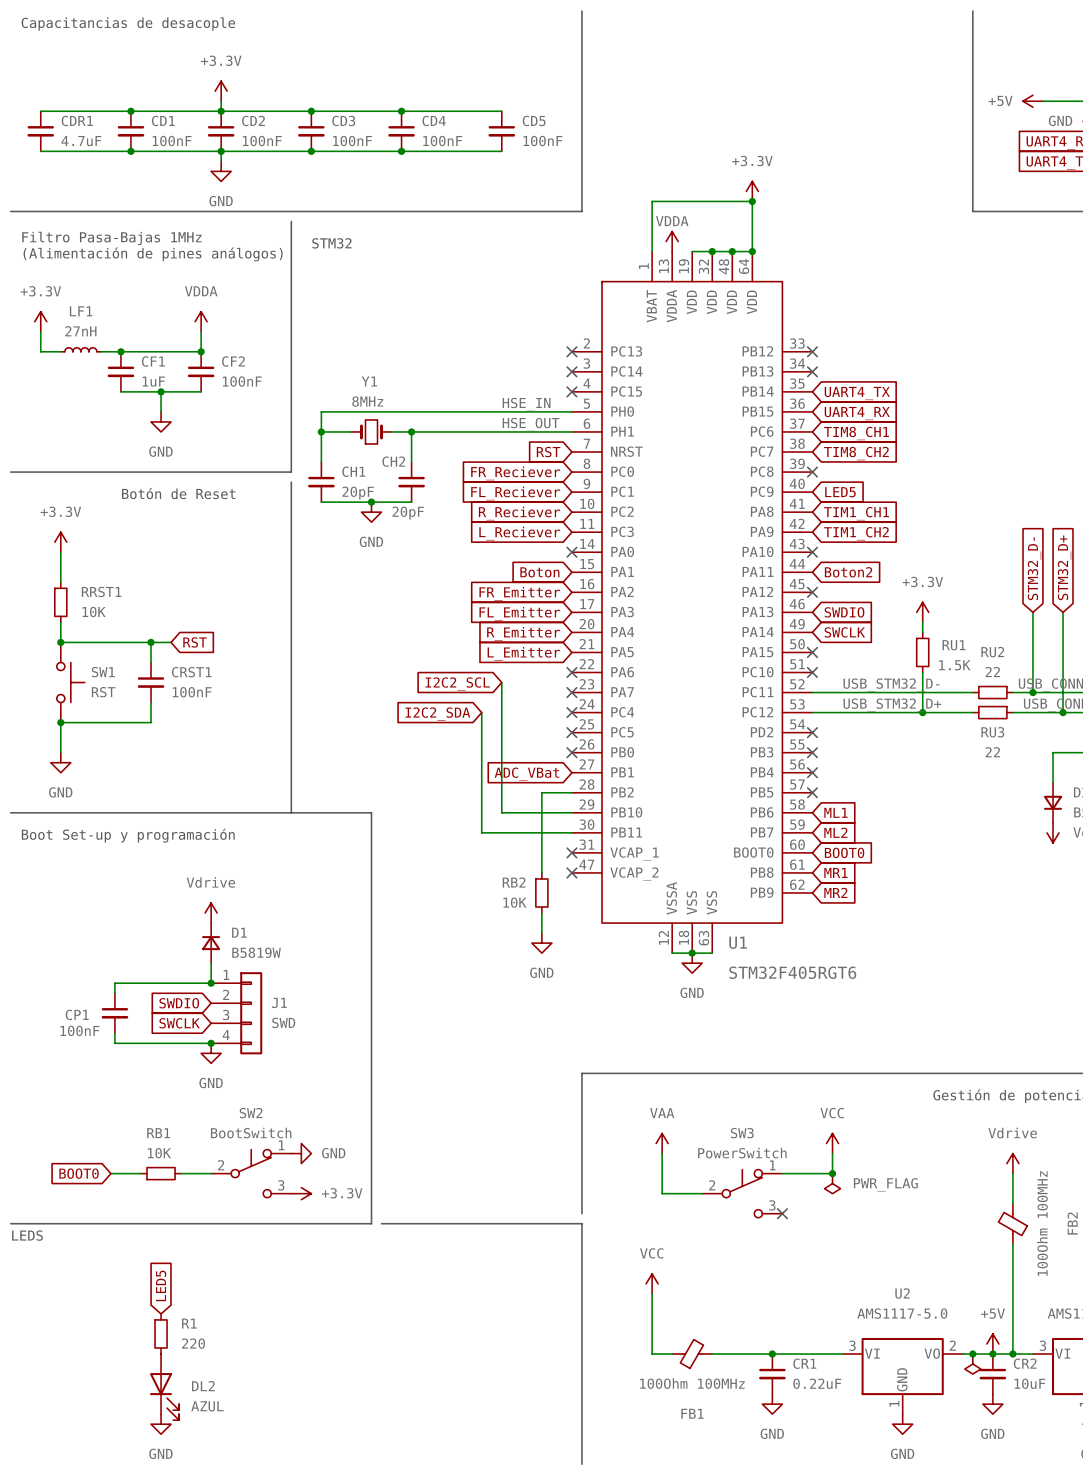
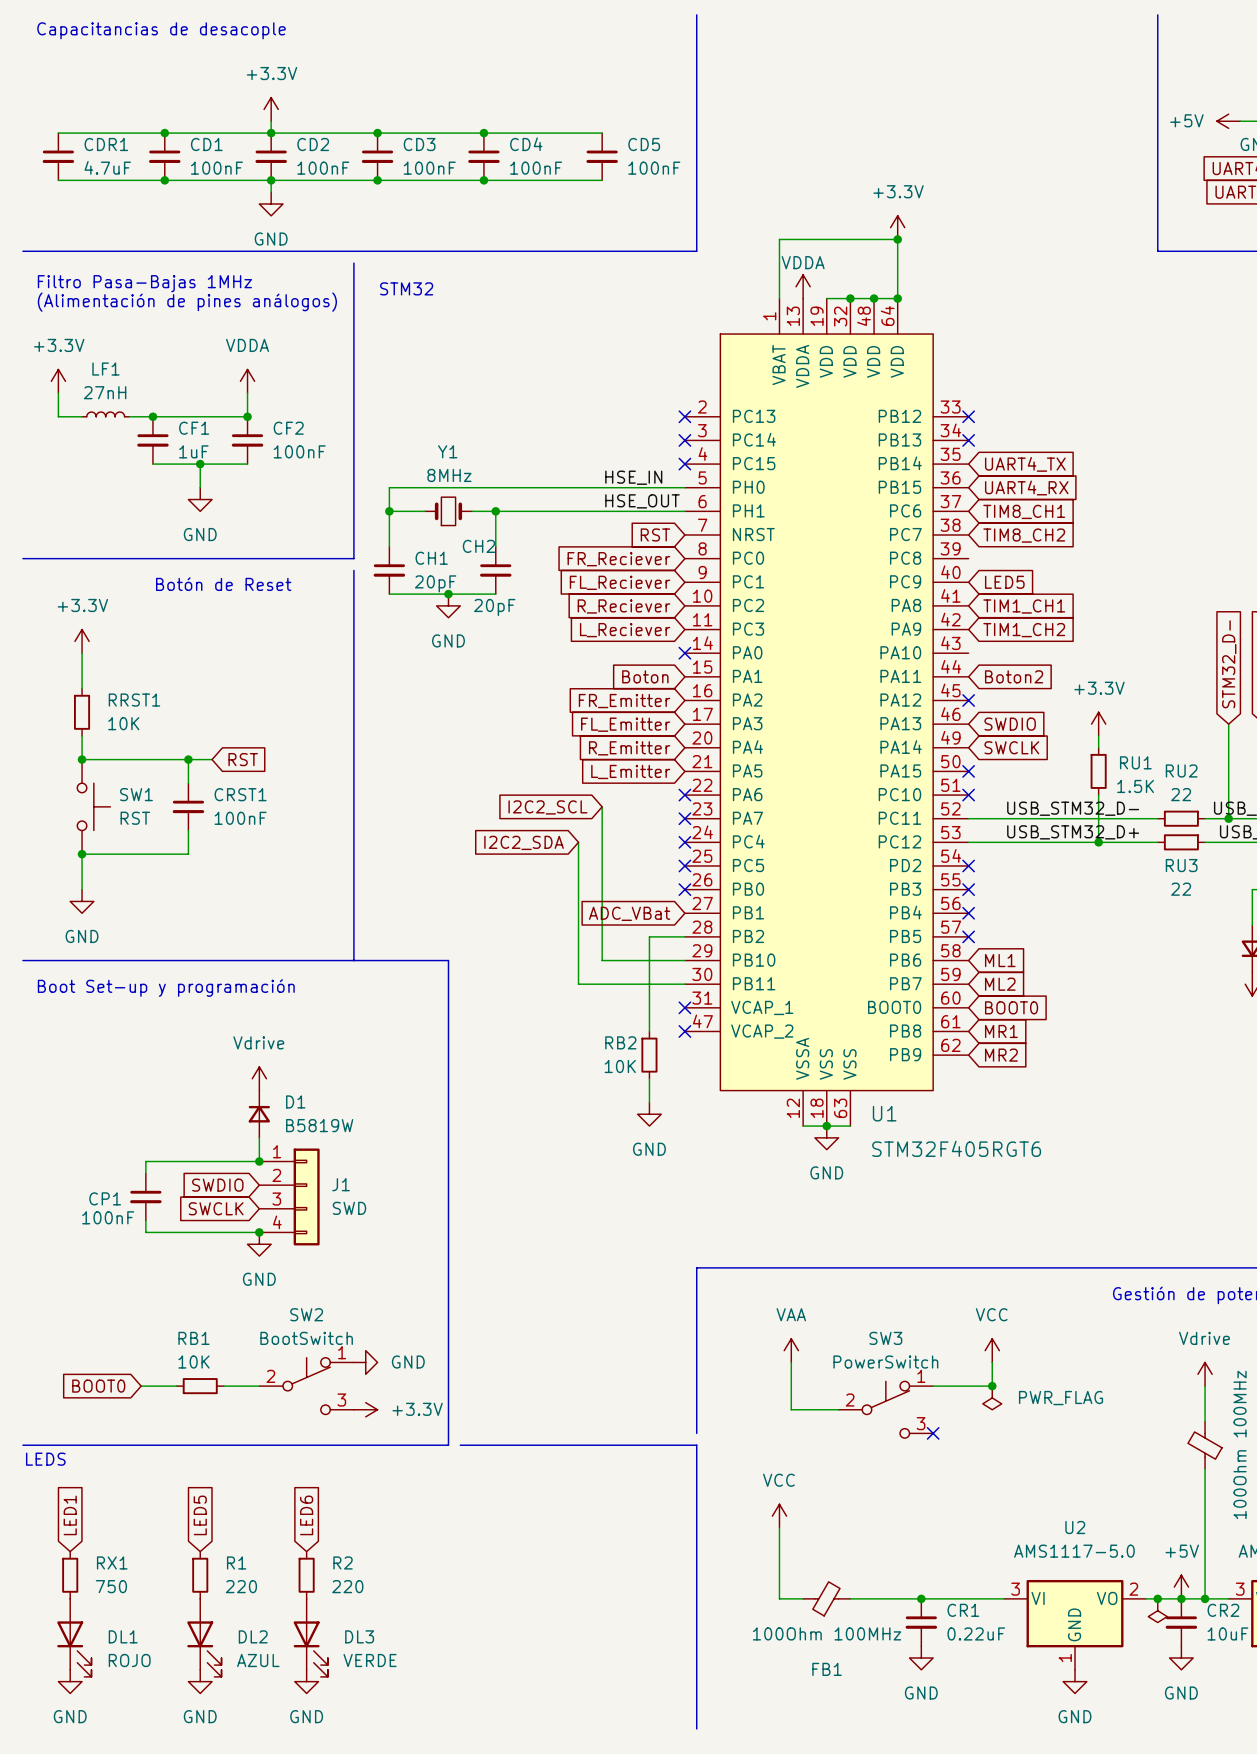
no-connect mark: (812, 472) -> none
no-connect mark: (812, 552) -> none
global label: none -> LED1 (70, 1515)
global label: none -> LED6 (306, 1515)
RX1: none -> 750 (70, 1575)
R2: none -> 220 (306, 1575)
DL1: none -> ROJO (74, 1637)
DL3: none -> VERDE (310, 1637)
power symbol: none -> GND (70, 1681)
power symbol: none -> GND (306, 1681)

